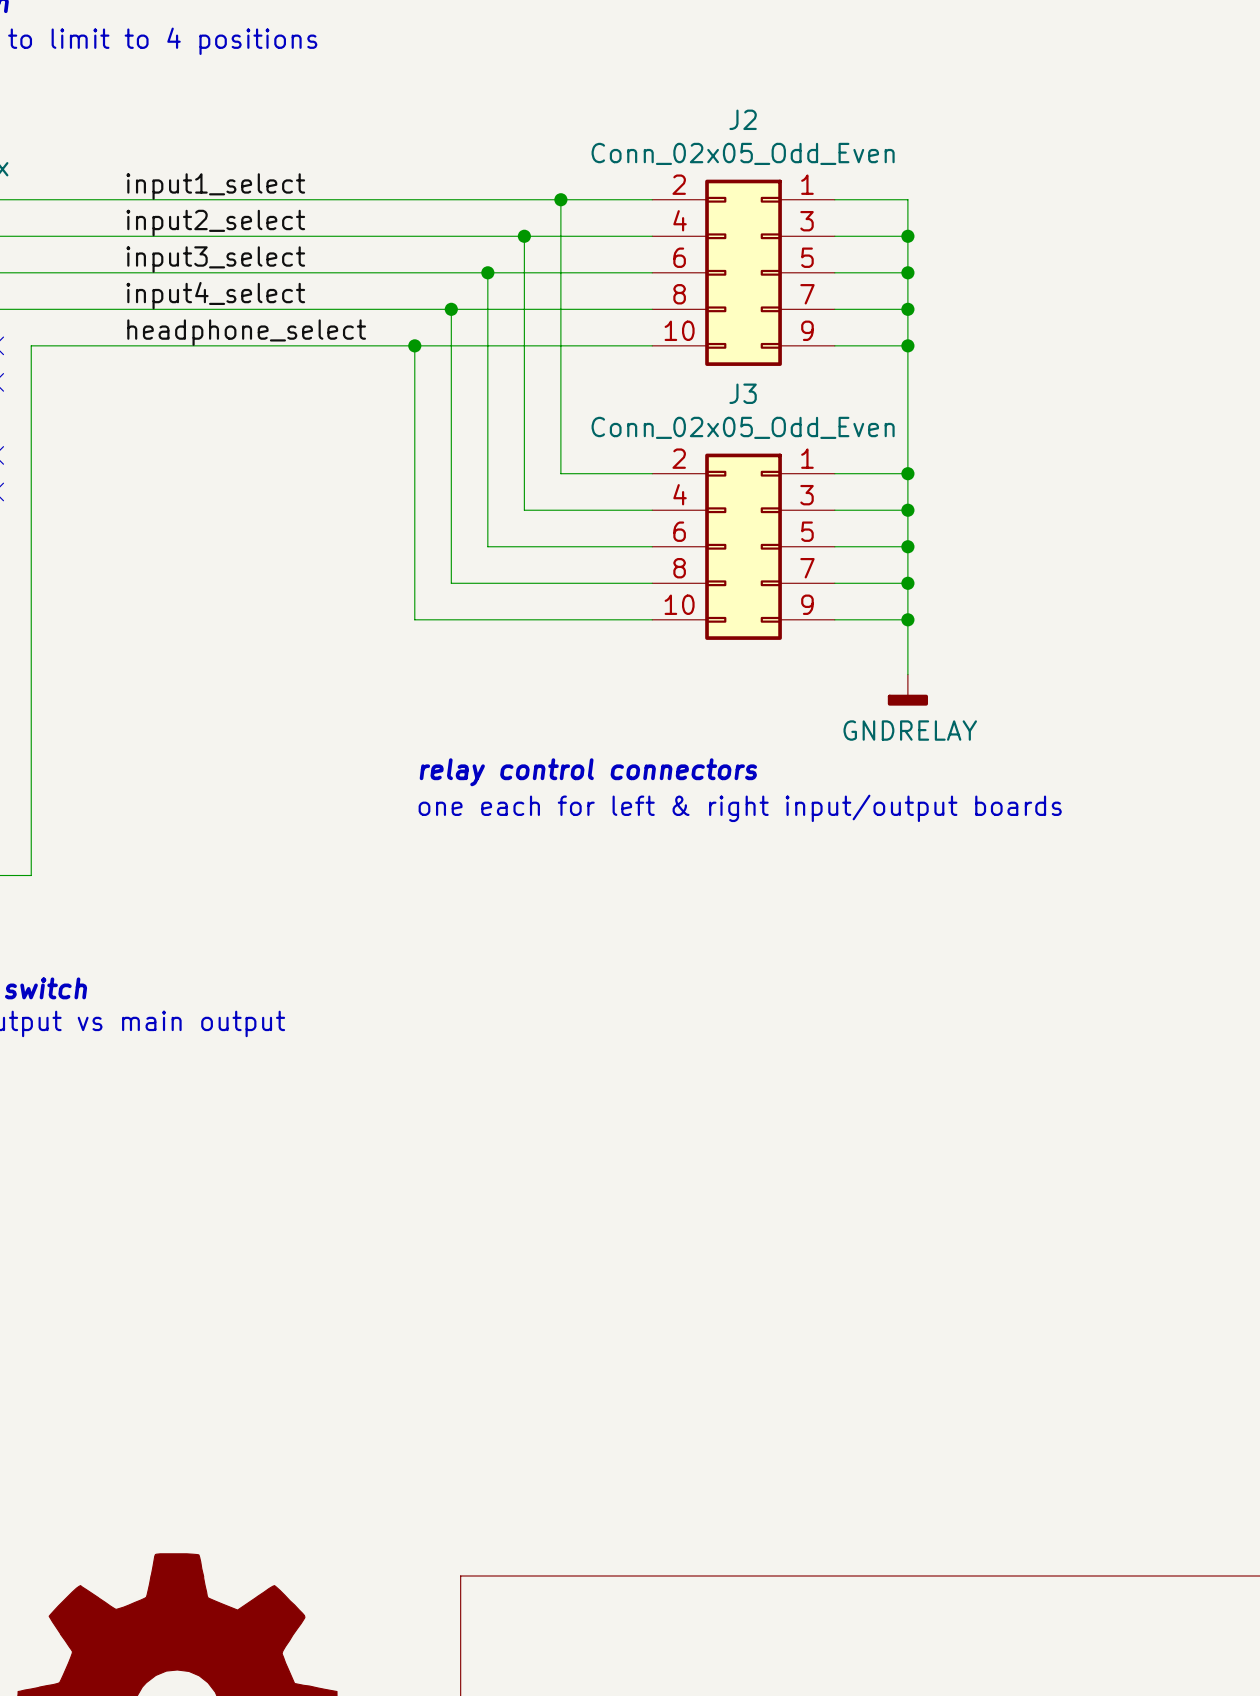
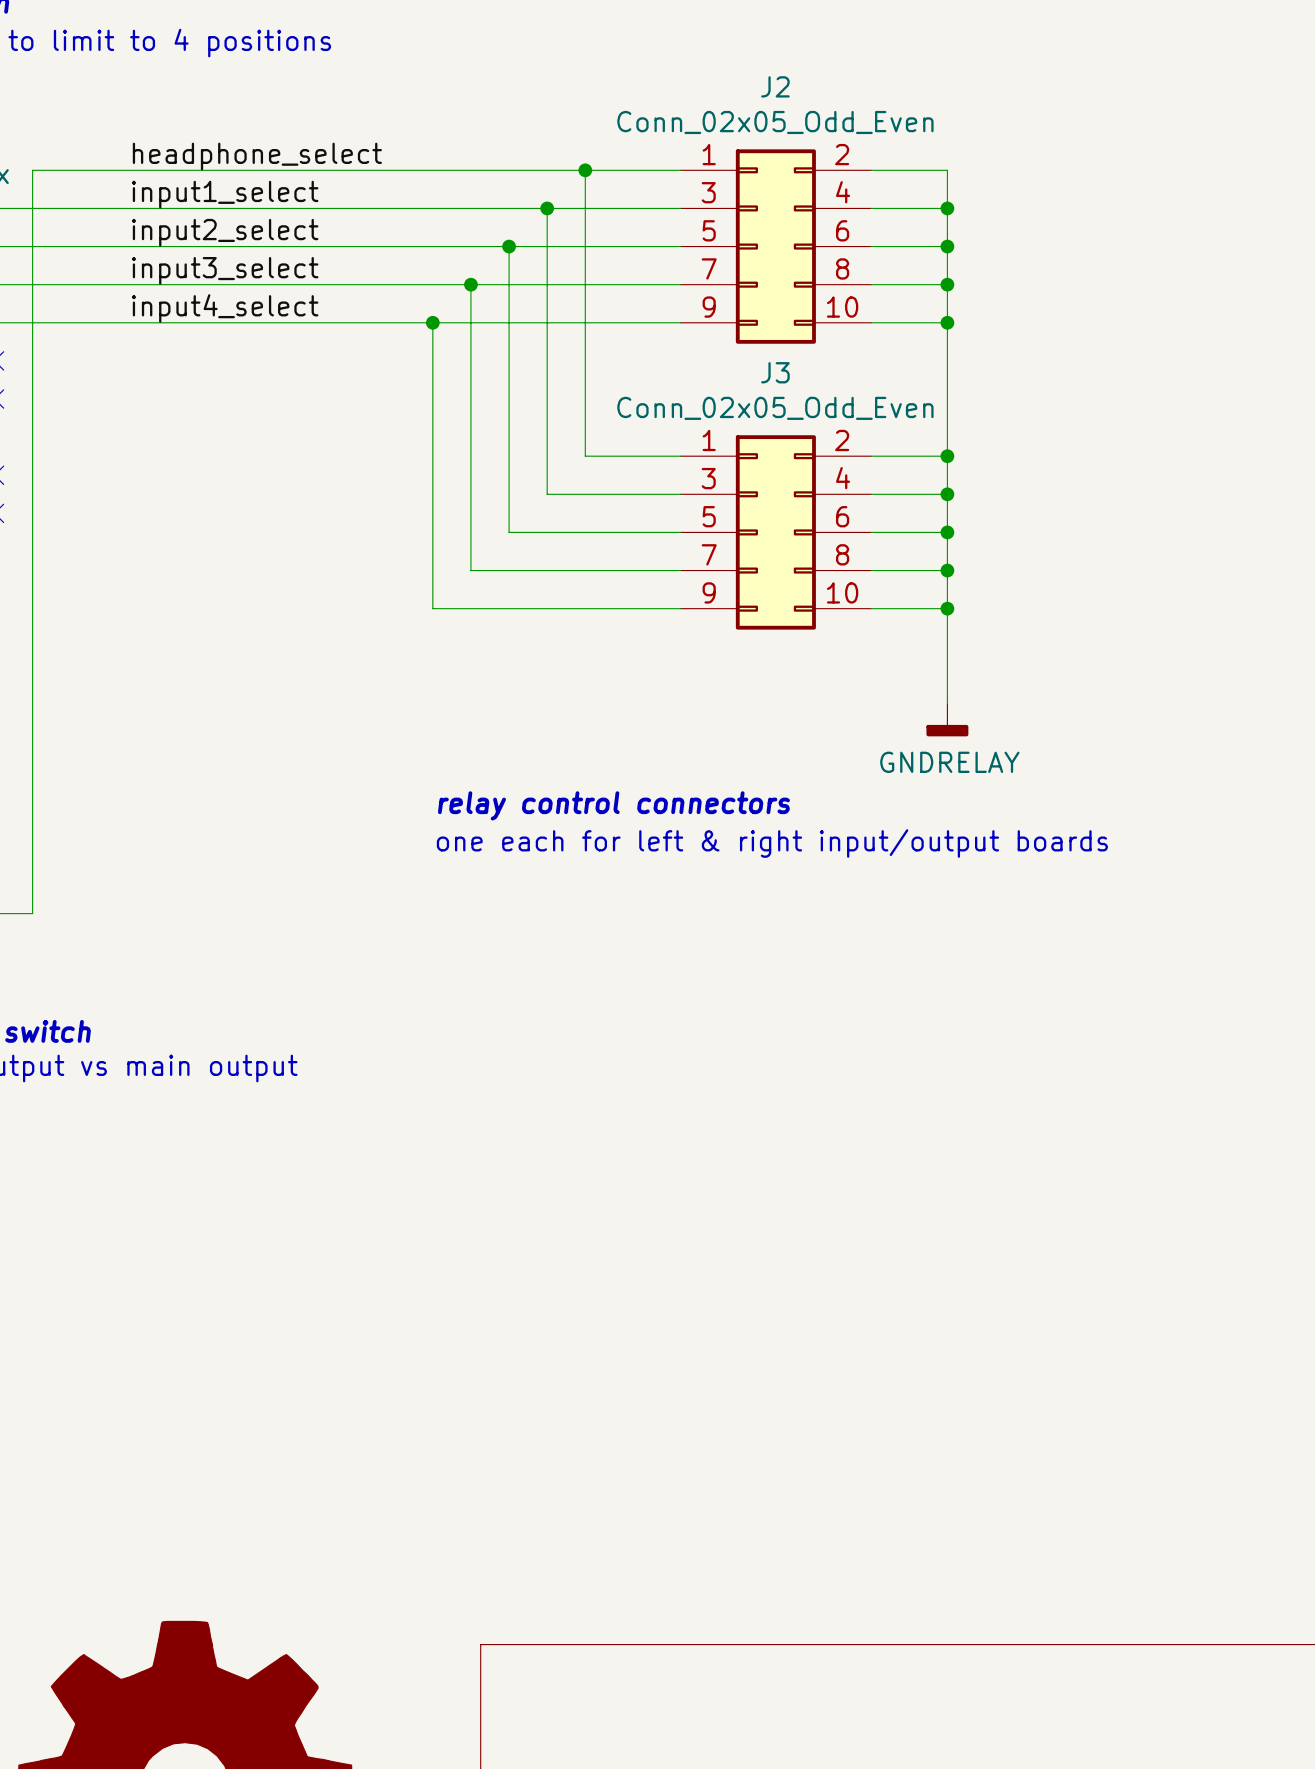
wire: none -> (585, 170) (585, 208)
junction: none -> (585, 170)
wire: none -> (871, 170) (947, 170) (947, 208)
wire: none -> (547, 208) (547, 246)
junction: none -> (547, 208)
junction: (560, 199) -> none
junction: none -> (947, 208)
wire: none -> (509, 246) (509, 284)
junction: none -> (509, 246)
junction: (524, 236) -> none
wire: none -> (470, 284) (470, 322)
junction: none -> (470, 284)
junction: (487, 272) -> none
J2 flip: as is (743, 272) -> left-right (775, 246)
wire: none -> (432, 322) (432, 360)
junction: none -> (432, 322)
junction: (451, 309) -> none
label position: headphone_select (246, 332) -> headphone_select (257, 156)
wire: (31, 345) (652, 345) -> (32, 360) (32, 170) (680, 170)
junction: (414, 345) -> none
wire: (834, 345) (907, 345) -> (871, 456) (947, 456)
junction: (907, 345) -> none
wire: (560, 437) (560, 473) -> (547, 494) (585, 494)
wire: none -> (585, 456) (680, 456)
junction: none -> (947, 456)
wire: (524, 473) (524, 510) -> (509, 532) (547, 532)
wire: (487, 510) (487, 546) -> (470, 570) (509, 570)
wire: (451, 546) (451, 583) -> (432, 608) (470, 608)
J3 flip: as is (743, 546) -> left-right (775, 532)
wire: (414, 583) (414, 619) (652, 619) -> none
wire: (834, 619) (907, 619) -> none
junction: (907, 619) -> none

